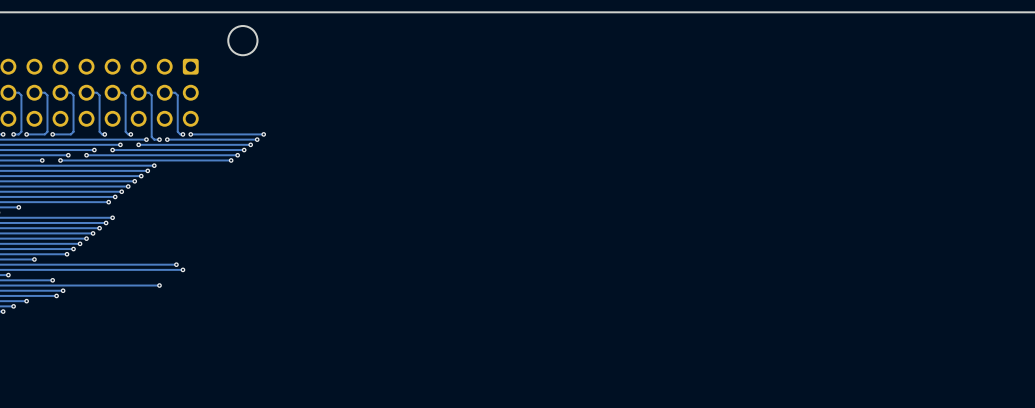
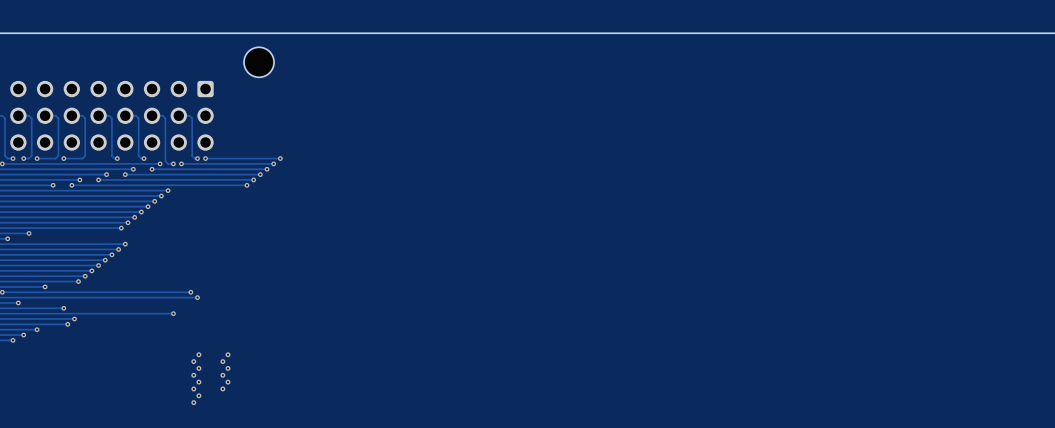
via: none -> (198, 354)
via: none -> (227, 354)
via: none -> (193, 361)
via: none -> (222, 361)
via: none -> (198, 368)
via: none -> (227, 368)
via: none -> (193, 375)
via: none -> (222, 375)
via: none -> (198, 382)
via: none -> (227, 382)
via: none -> (193, 388)
via: none -> (222, 388)
via: none -> (198, 395)
via: none -> (193, 402)

